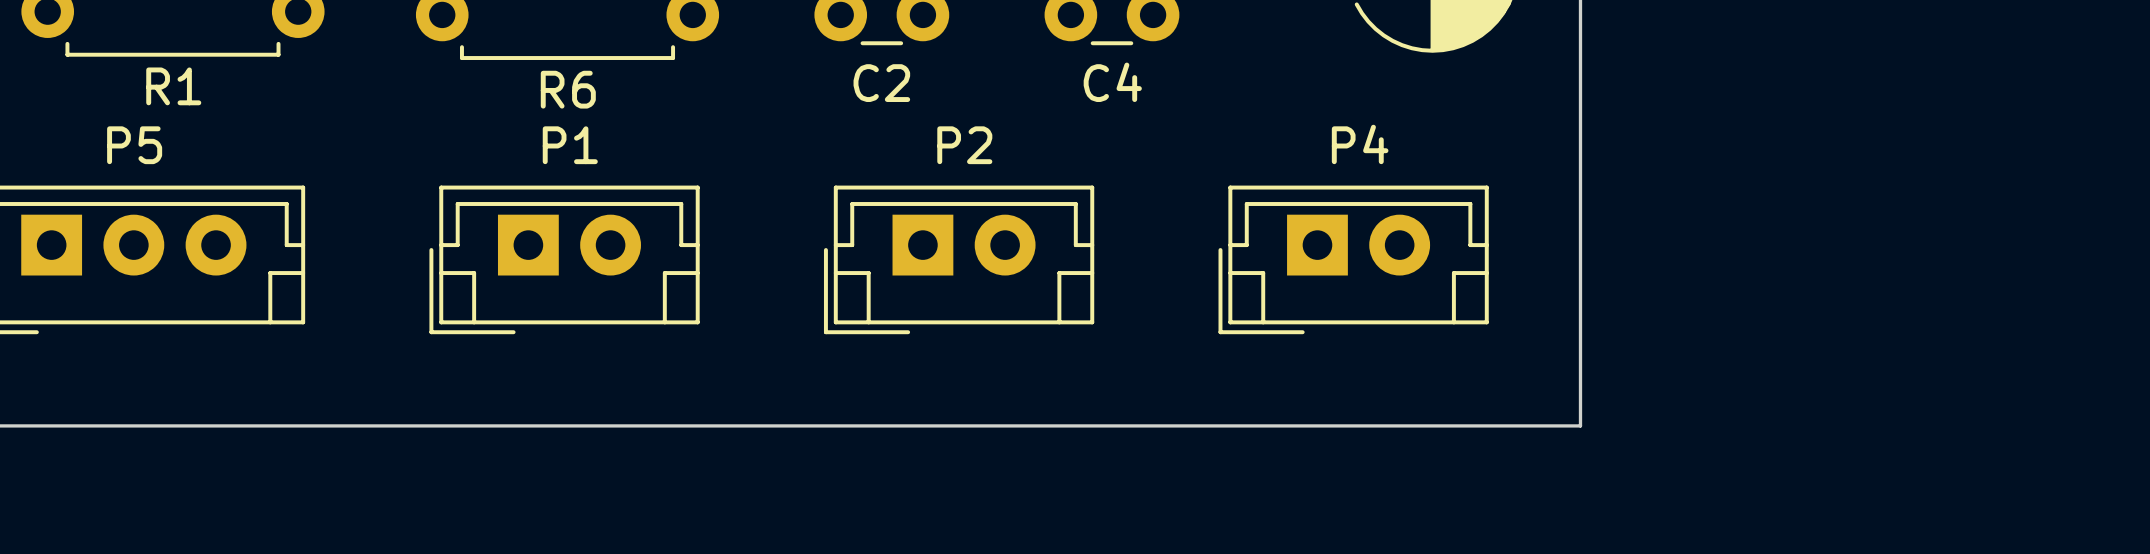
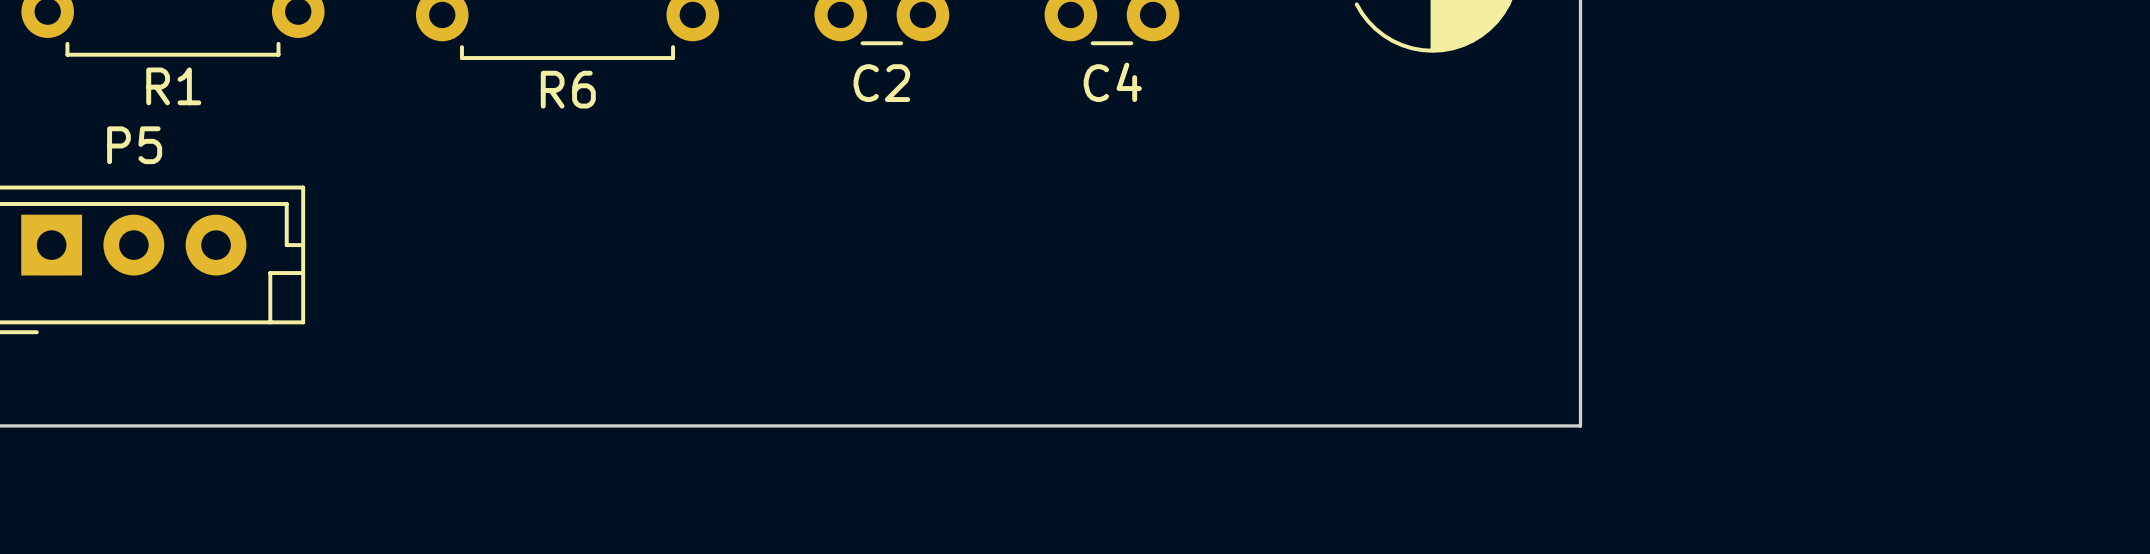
P1: (564, 259) -> none
P2: (959, 259) -> none
P4: (1353, 259) -> none

